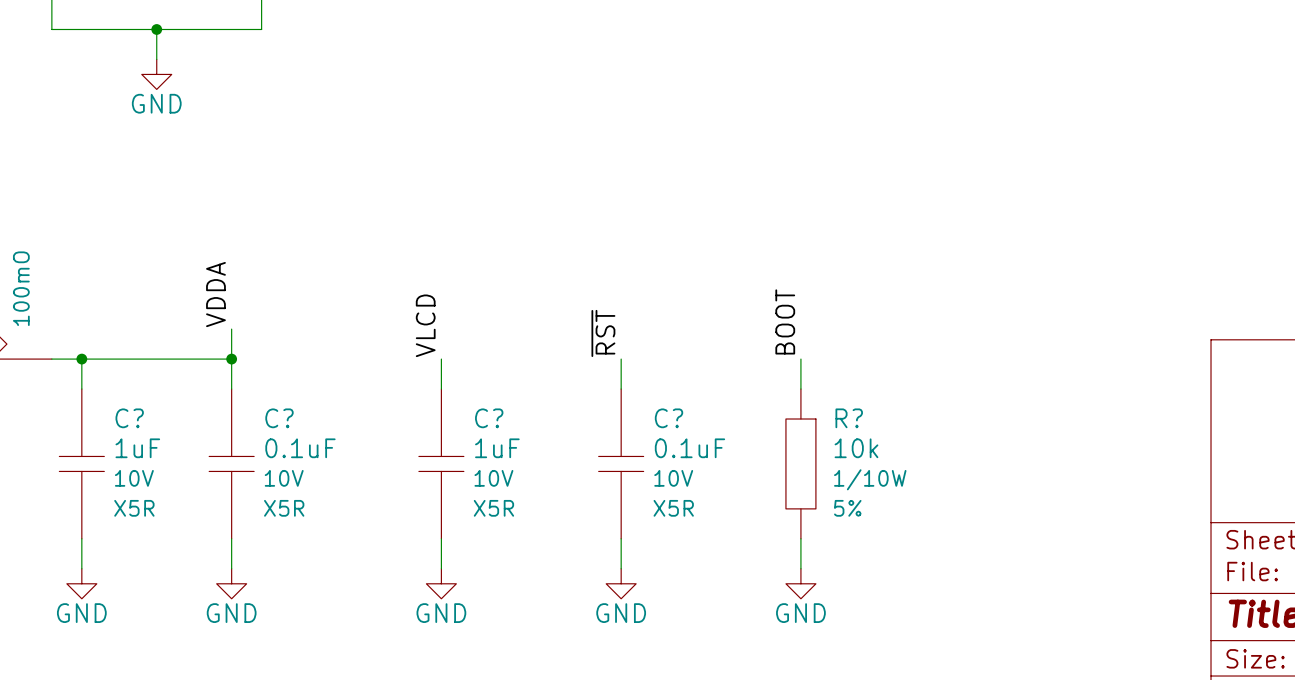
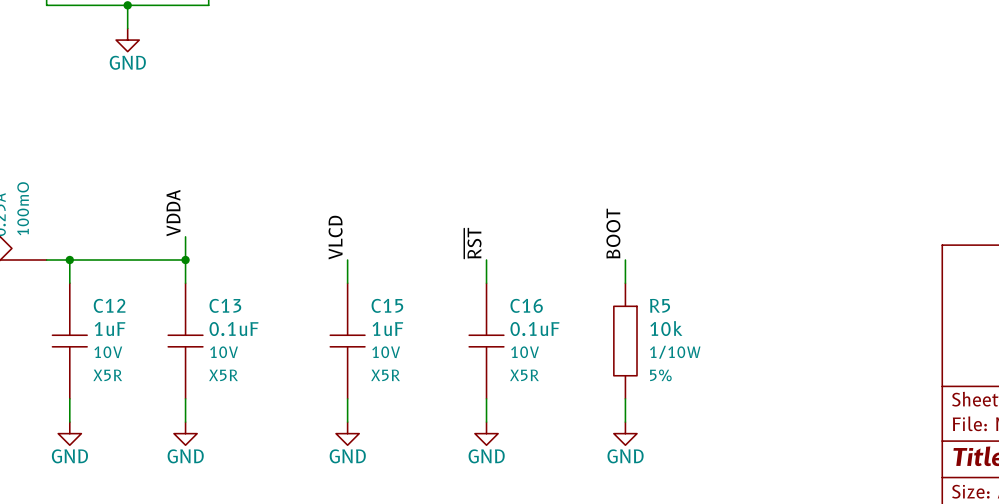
C? name: C? (129, 418) -> C12 (109, 305)
C? name: C? (279, 418) -> C13 (225, 305)
C? name: C? (489, 418) -> C15 (387, 305)
C? name: C? (669, 418) -> C16 (526, 305)
R? name: R? (849, 418) -> R5 (660, 305)

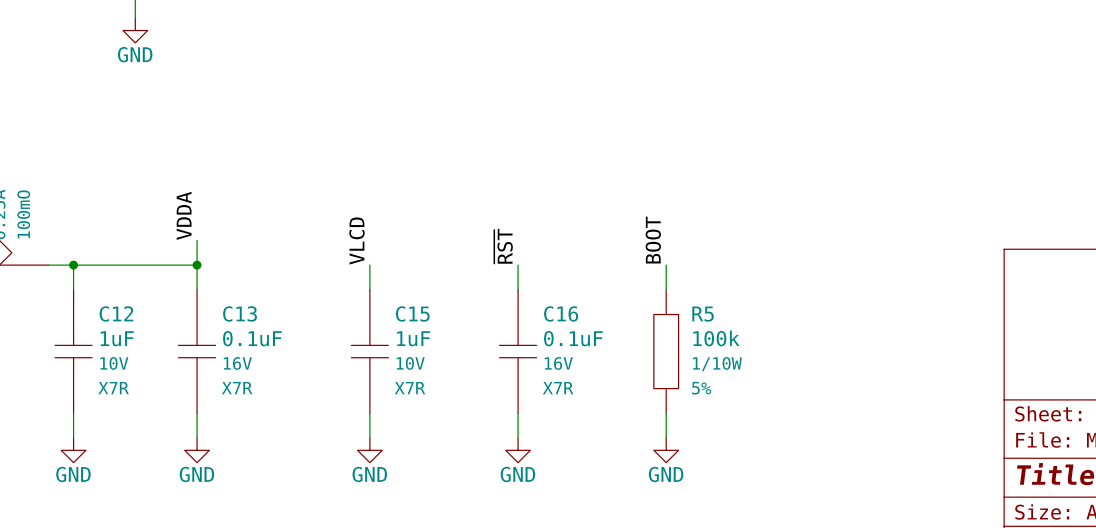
R5 value: 10k (666, 328) -> 100k (716, 338)
C13 text: 10V (224, 352) -> 16V (237, 363)
C16 text: 10V (525, 352) -> 16V (558, 363)
C12 text: X5R (107, 375) -> X7R (113, 388)
C13 text: X5R (223, 375) -> X7R (237, 388)
C15 text: X5R (385, 375) -> X7R (409, 388)
C16 text: X5R (524, 375) -> X7R (558, 388)

